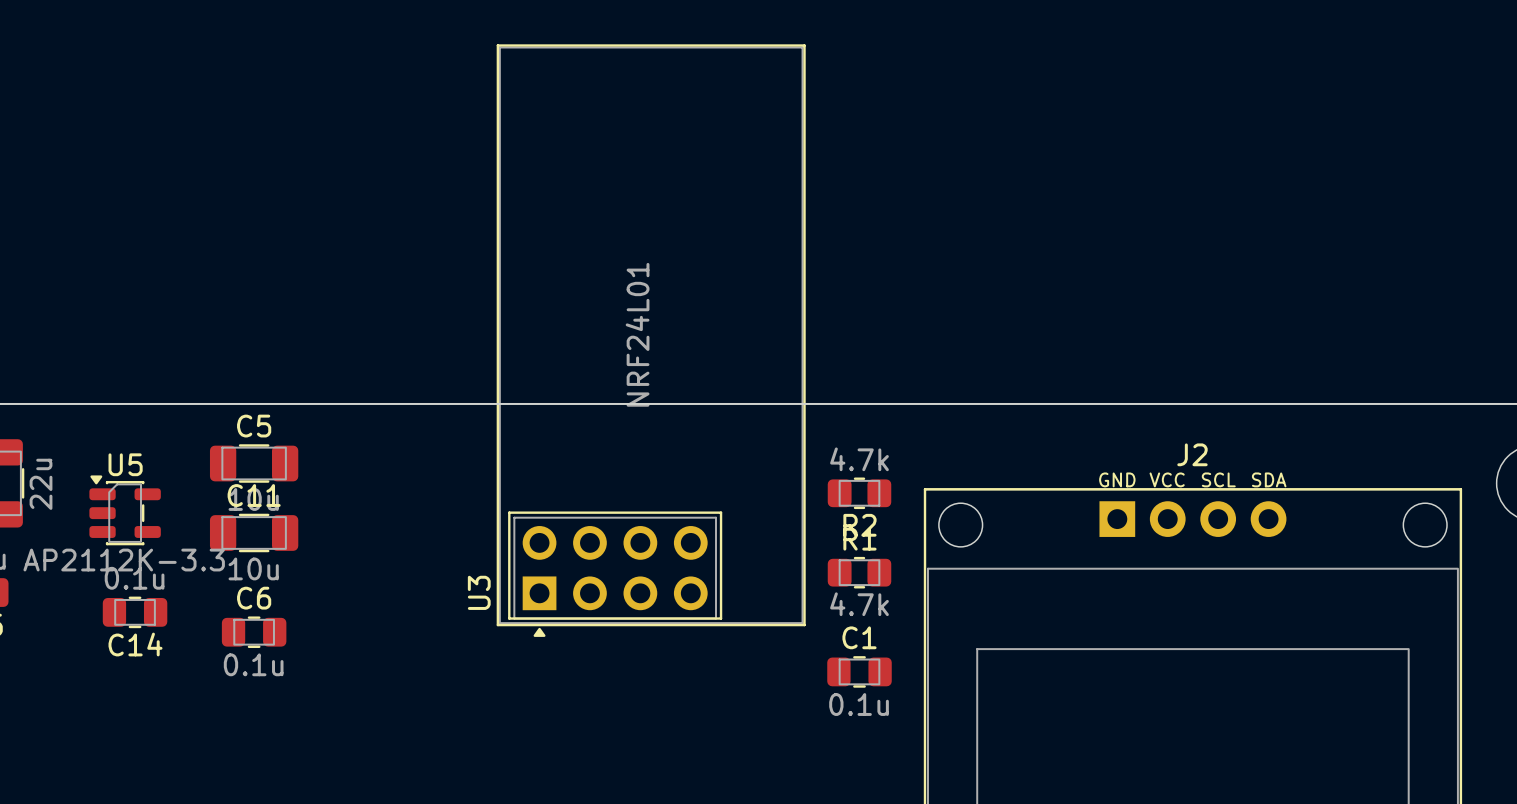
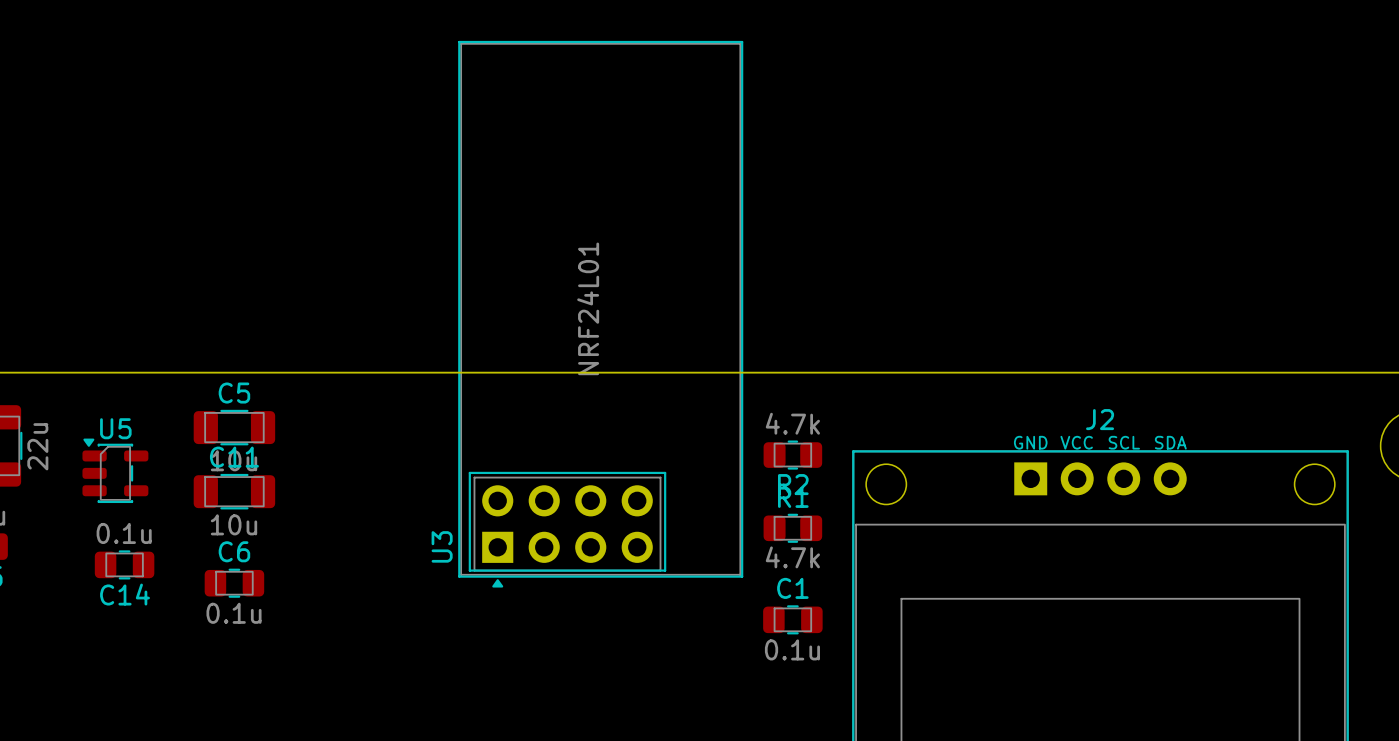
U5 value: AP2112K-3.3 (124, 560) -> none

